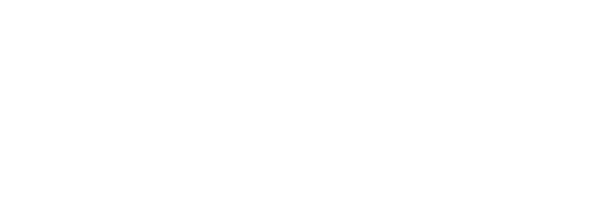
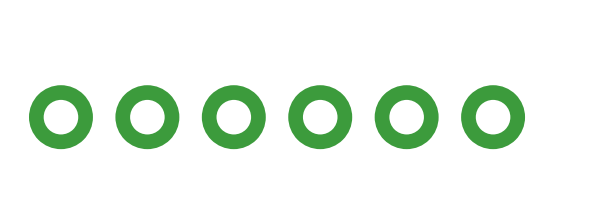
part: none -> (277, 117)

